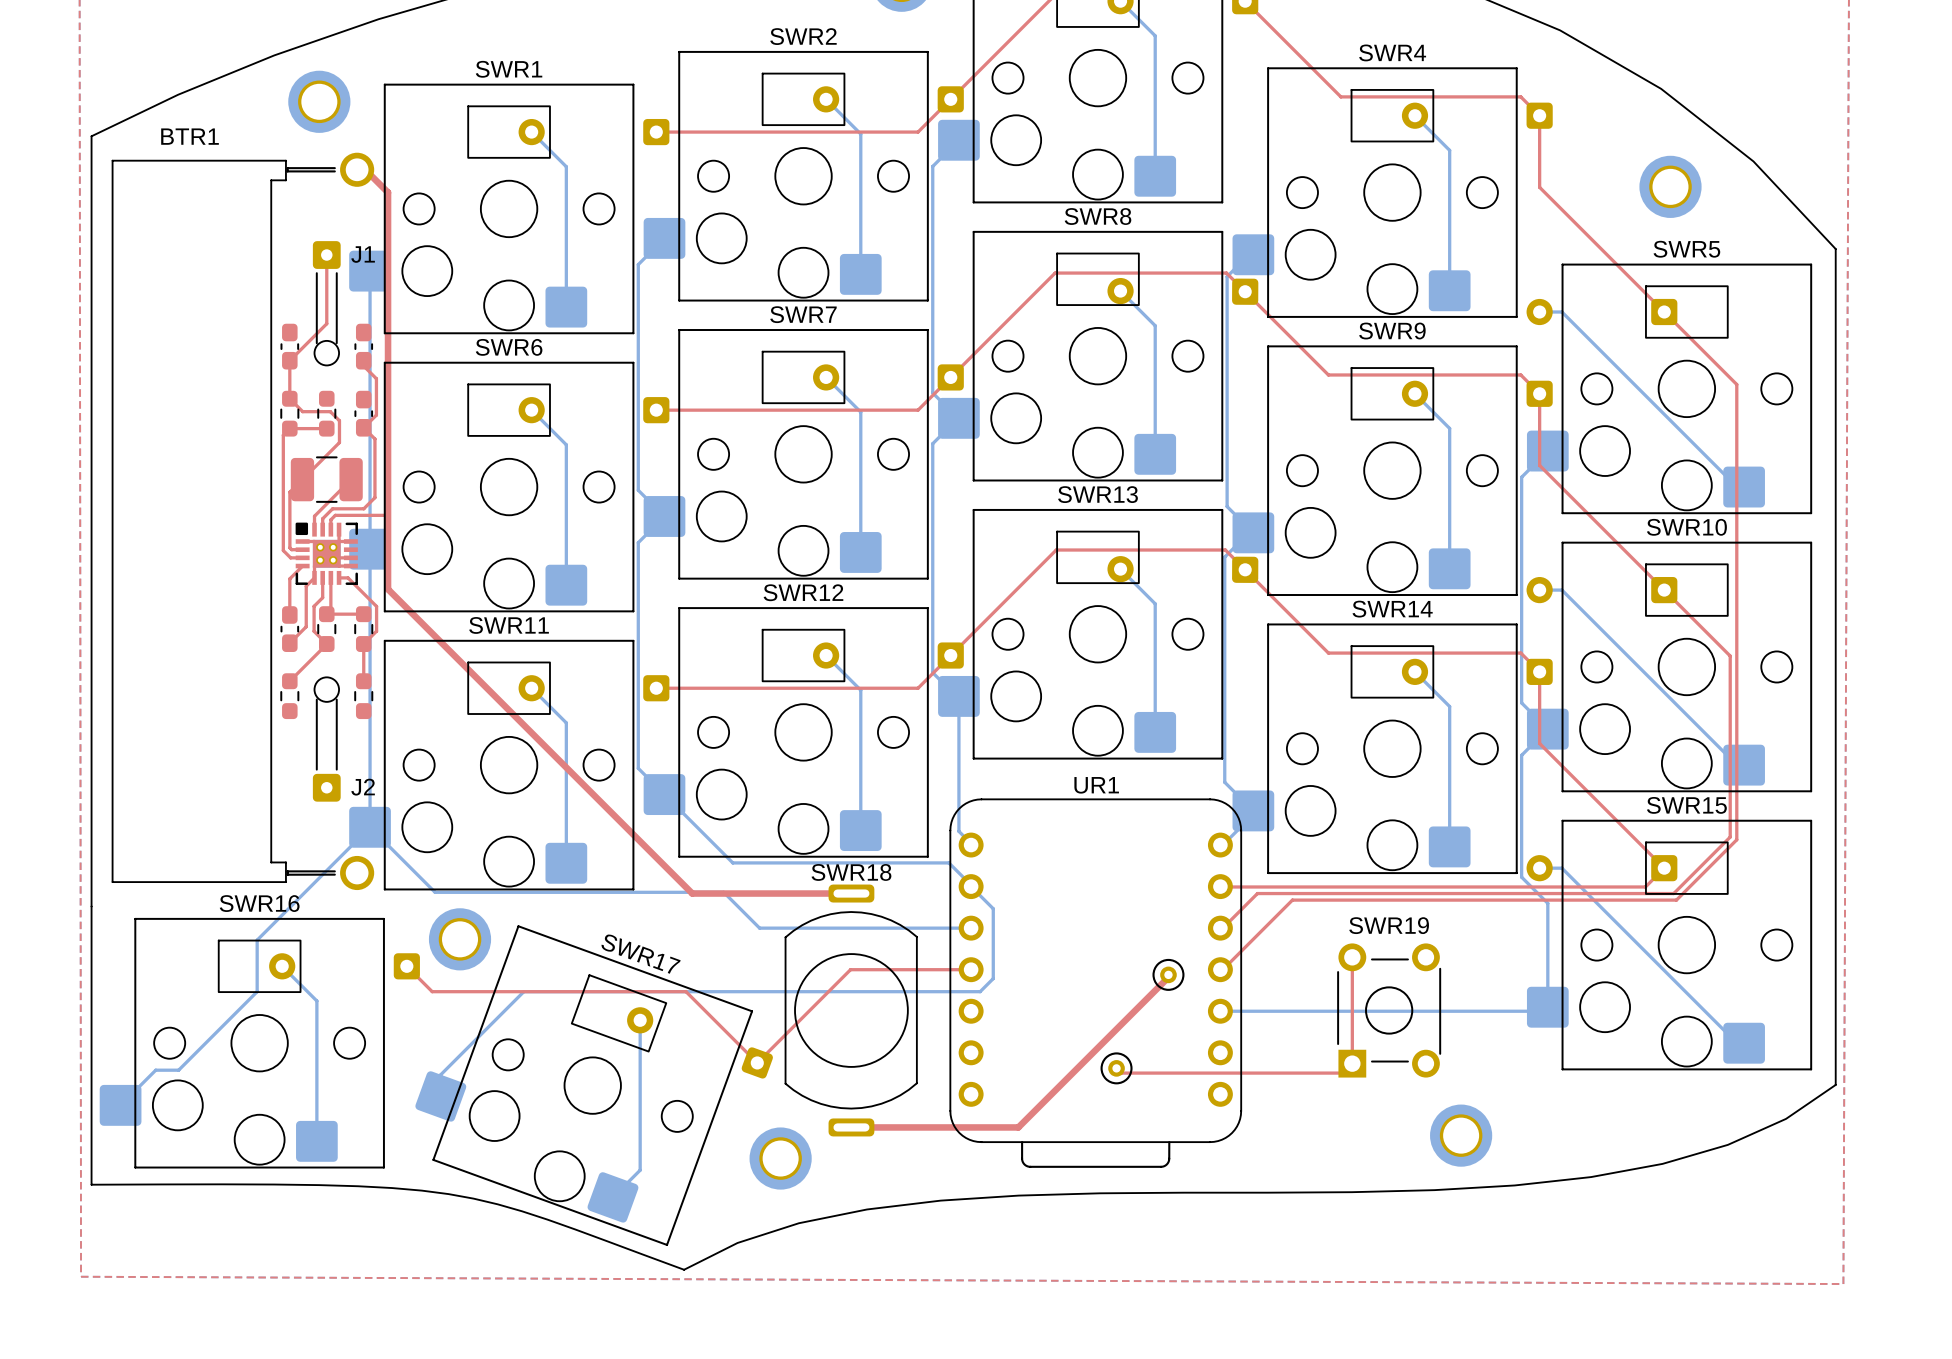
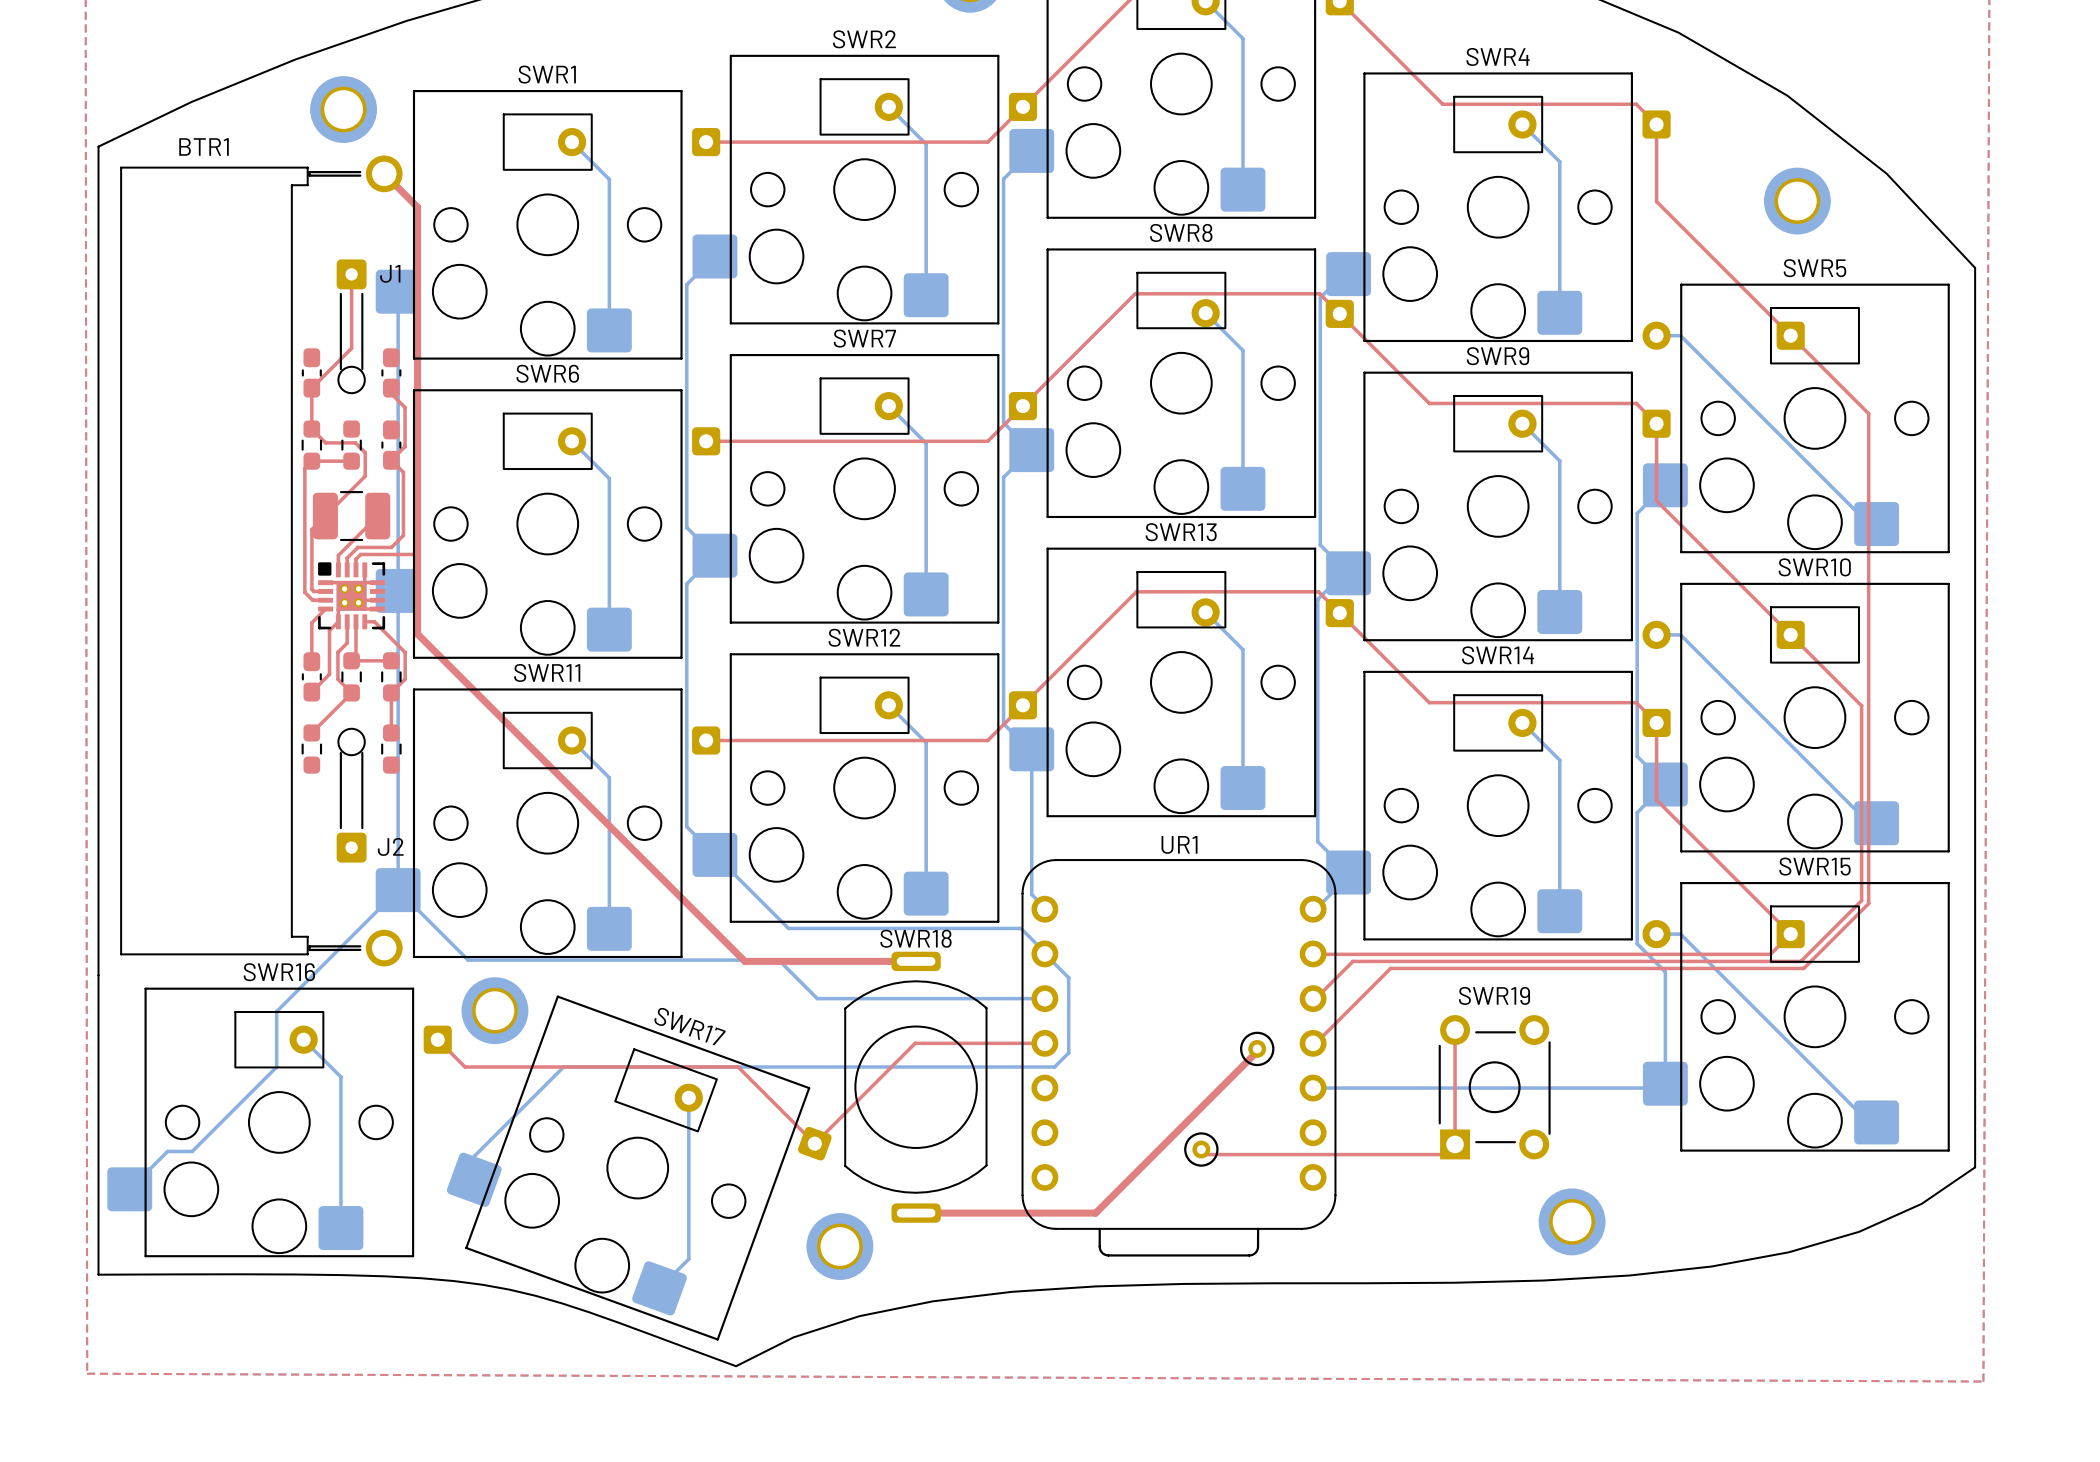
BTR1 footprint: [111, 152, 375, 891] -> [120, 155, 403, 967]

